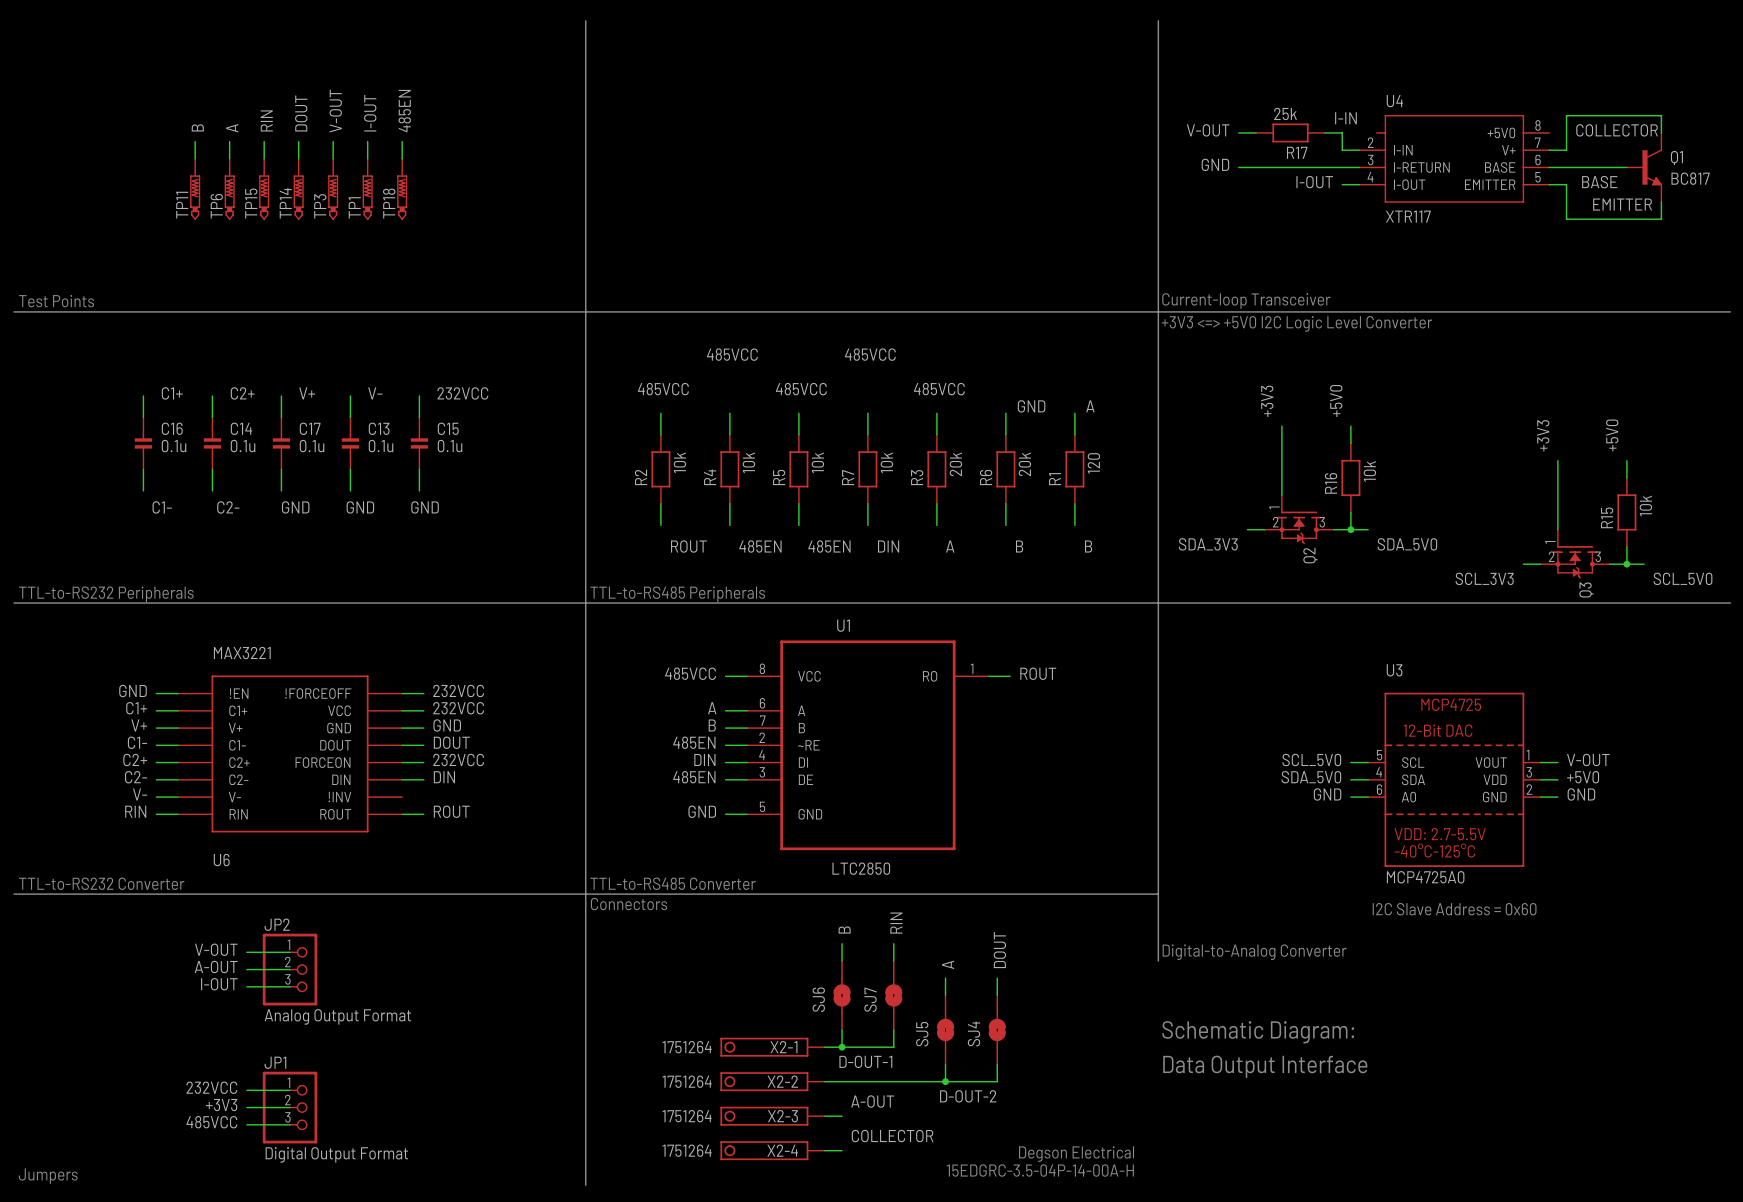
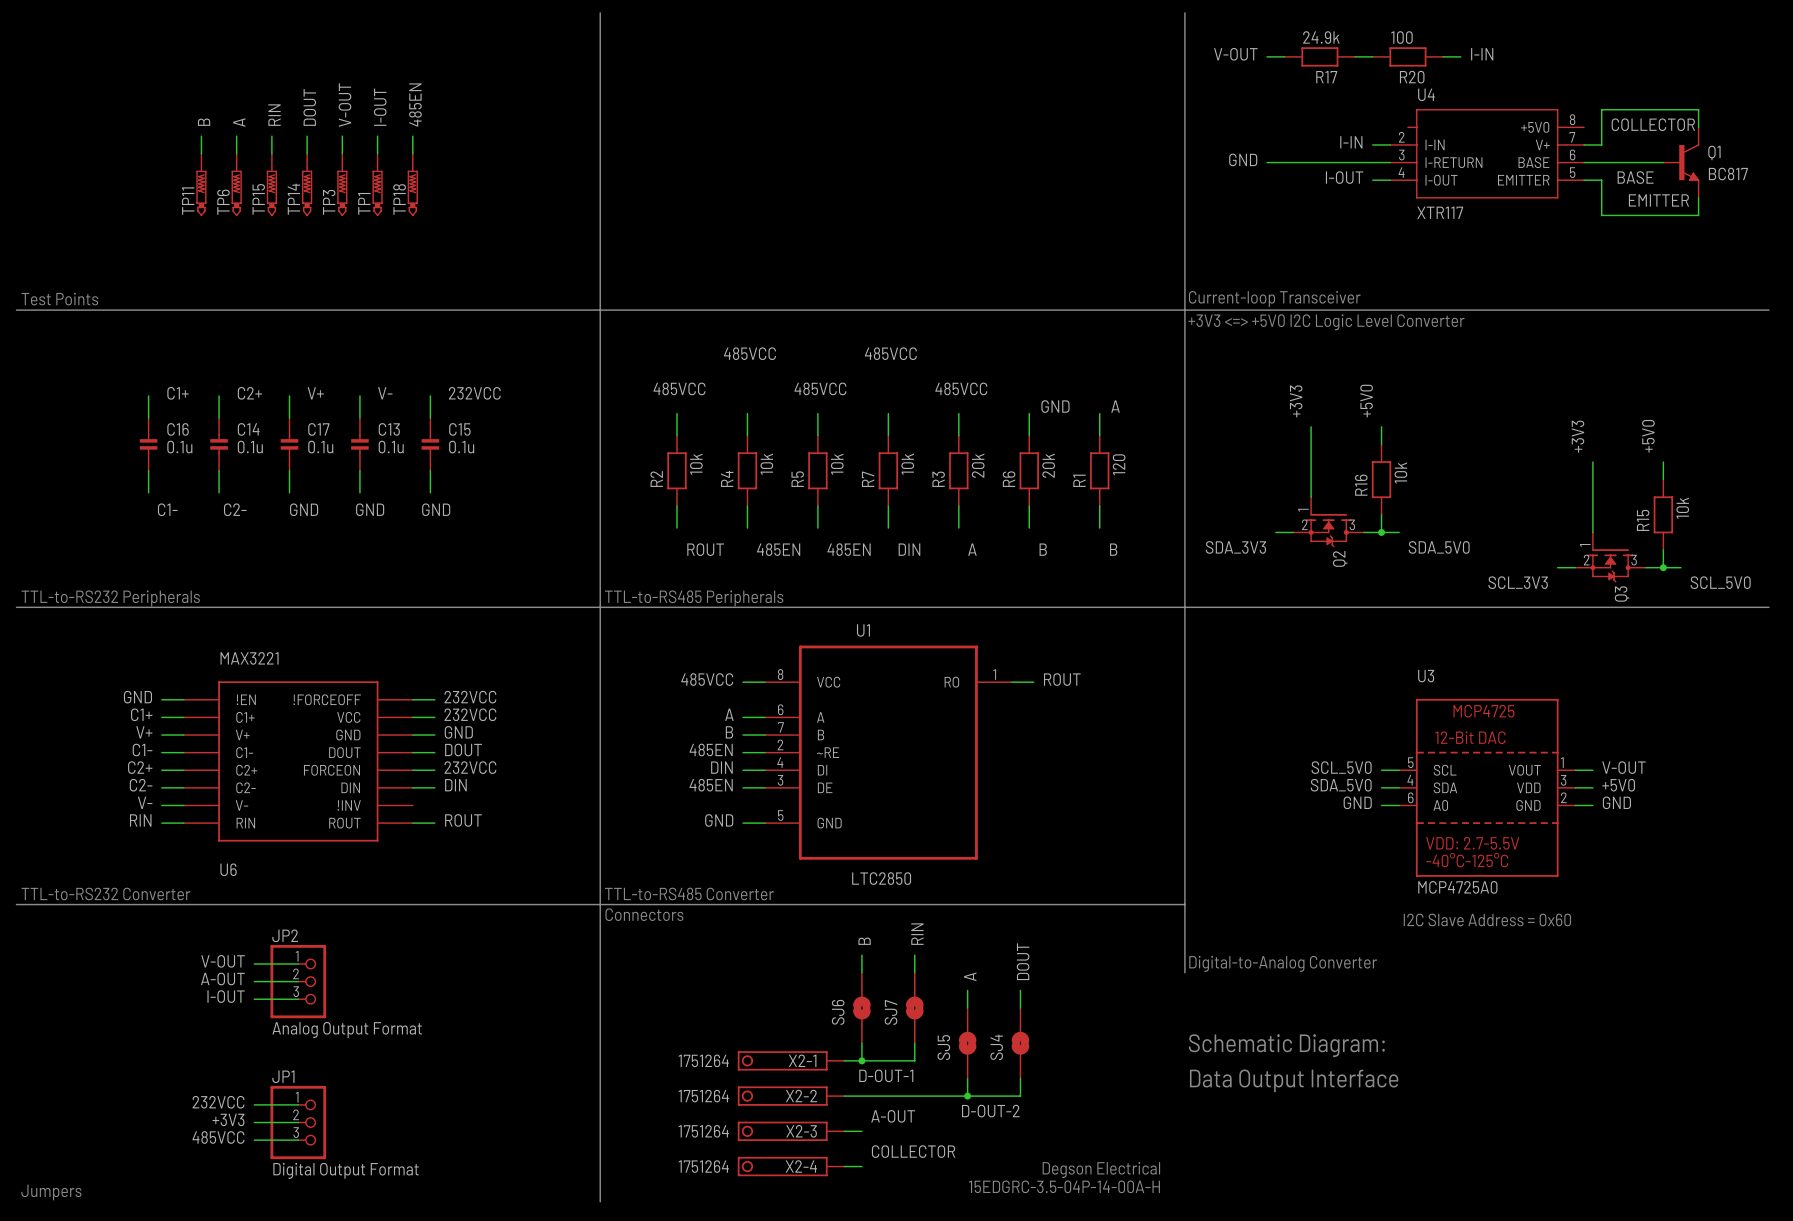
label: none -> I-IN (1482, 54)
wire: none -> (1355, 56) (1372, 56)
R20: none -> 100 (1407, 56)
wire: none -> (1443, 56) (1460, 56)
R17 value: 25k (1285, 113) -> 24.9k (1321, 37)
label position: I-IN (1345, 118) -> I-IN (1351, 142)
label position: V-OUT (1208, 130) -> V-OUT (1235, 54)
wire: (1238, 132) (1256, 132) -> (1267, 56) (1284, 56)
R17 position: (1290, 132) -> (1319, 56)
wire: (1325, 132) (1342, 132) (1342, 150) -> none

